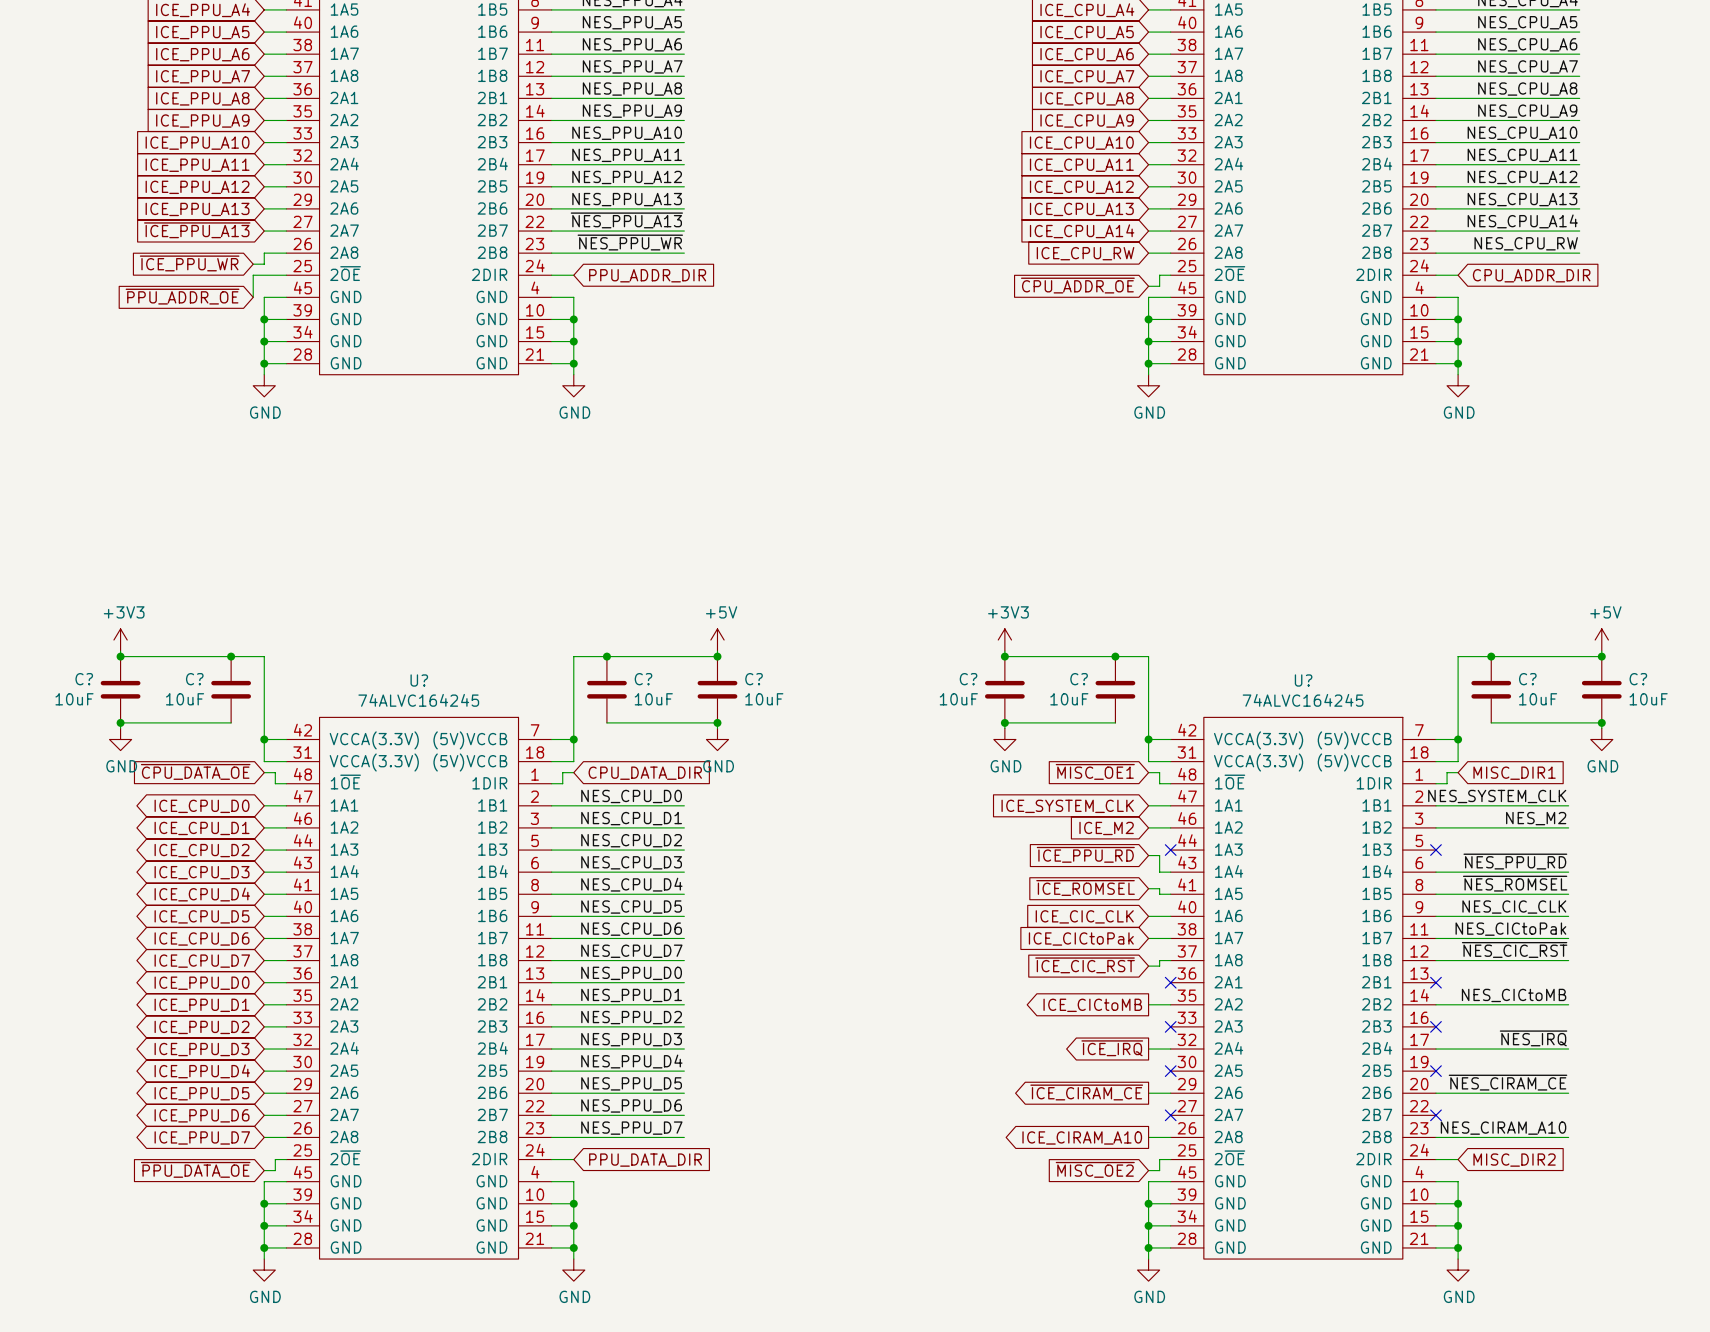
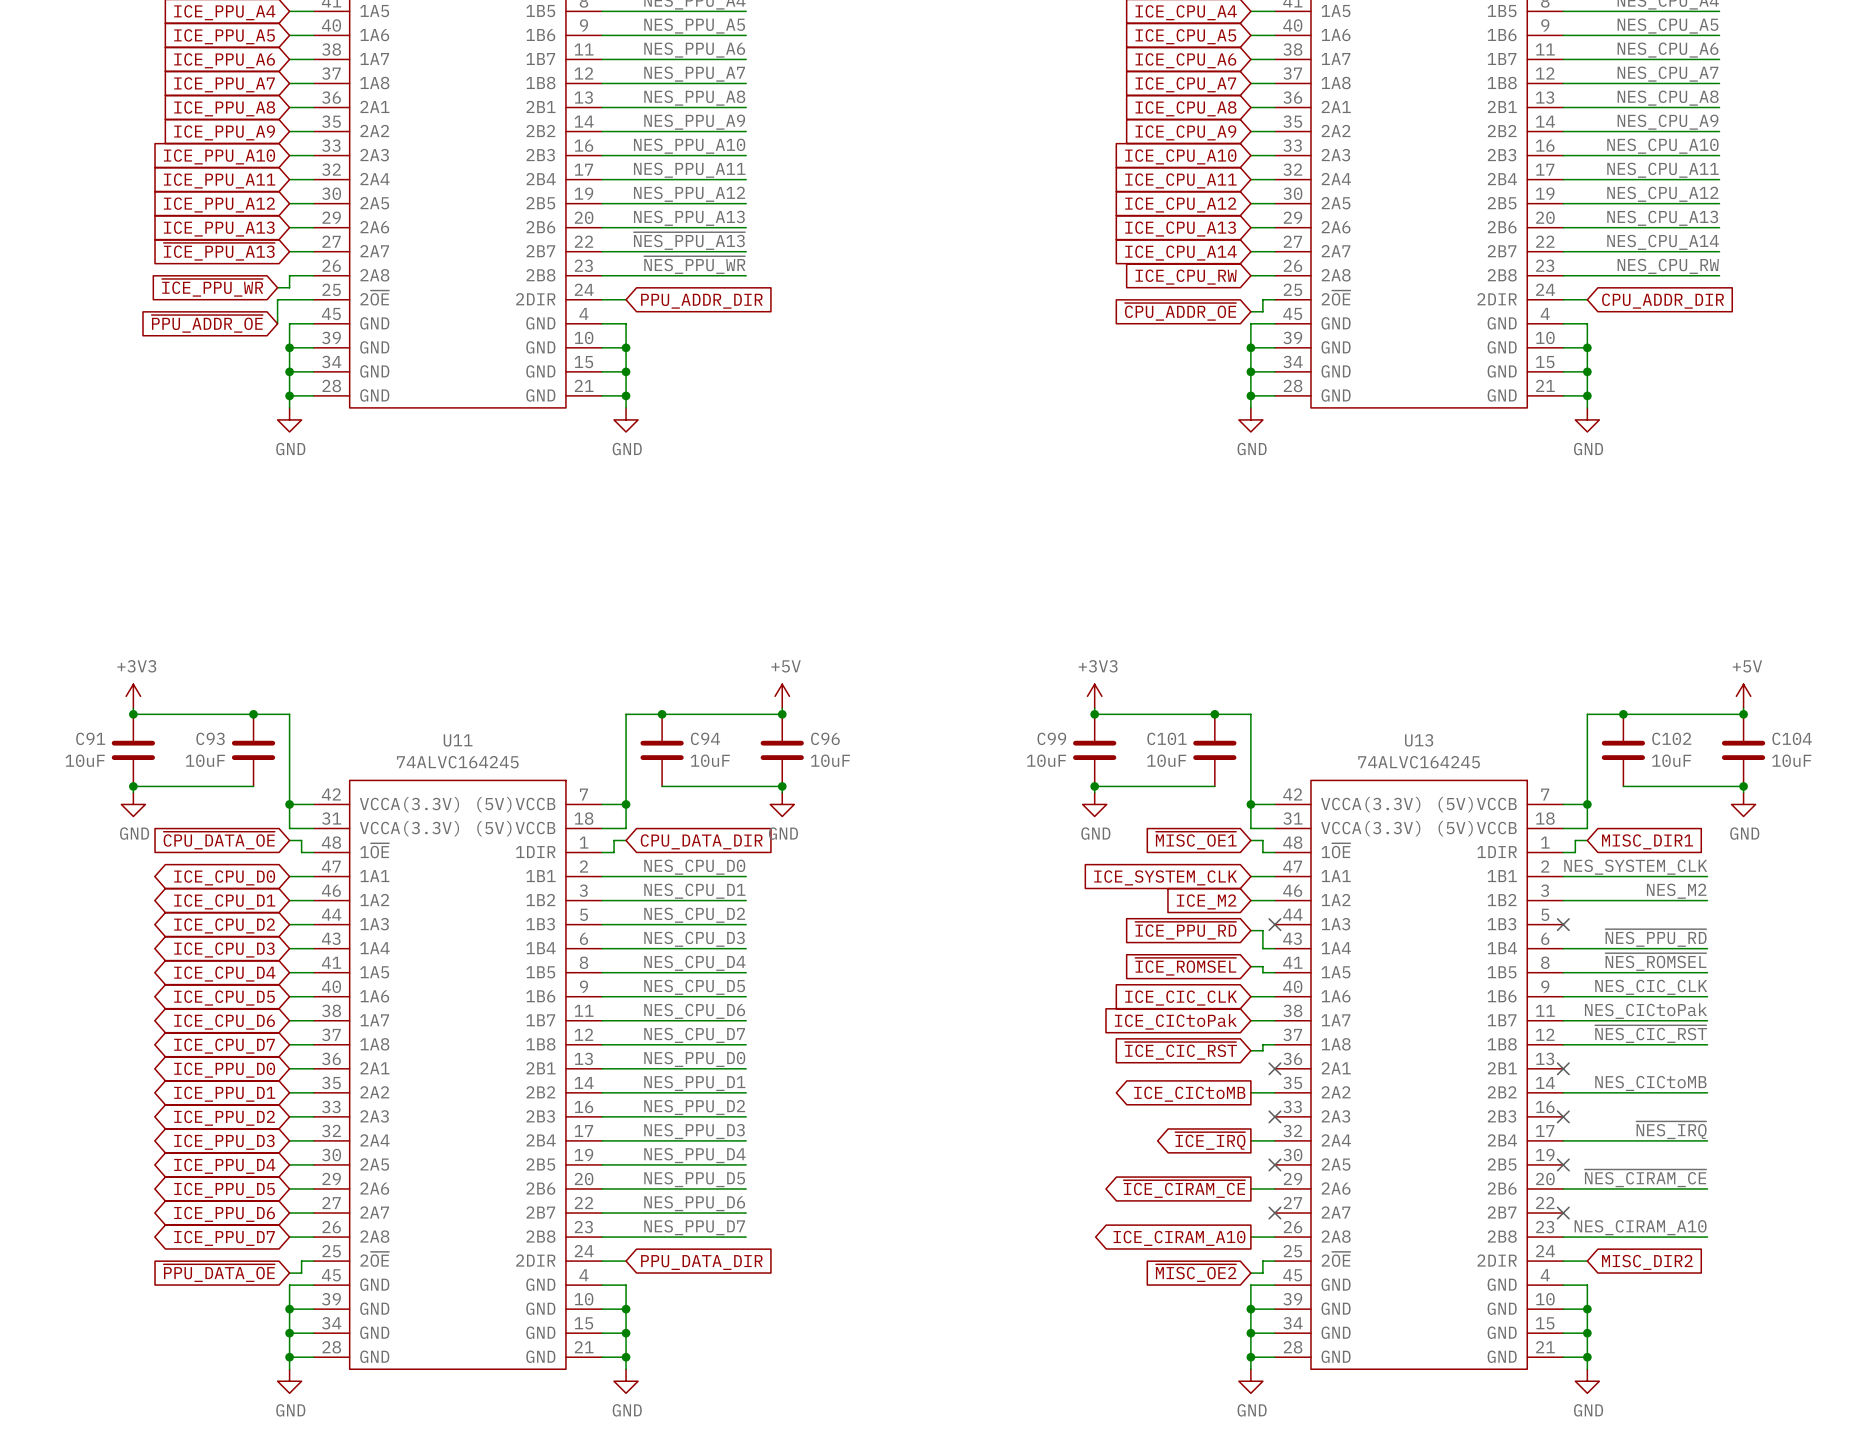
C? name: C? (84, 679) -> C91 (90, 738)
C? name: C? (194, 679) -> C93 (210, 738)
C? name: C? (643, 679) -> C94 (705, 738)
C? name: C? (754, 679) -> C96 (825, 738)
C? name: C? (968, 679) -> C99 (1051, 738)
C? name: C? (1079, 679) -> C101 (1166, 738)
C? name: C? (1527, 679) -> C102 (1671, 738)
C? name: C? (1638, 679) -> C104 (1792, 738)
U? name: U? (419, 680) -> U11 (458, 740)
U? name: U? (1303, 680) -> U13 (1419, 740)

